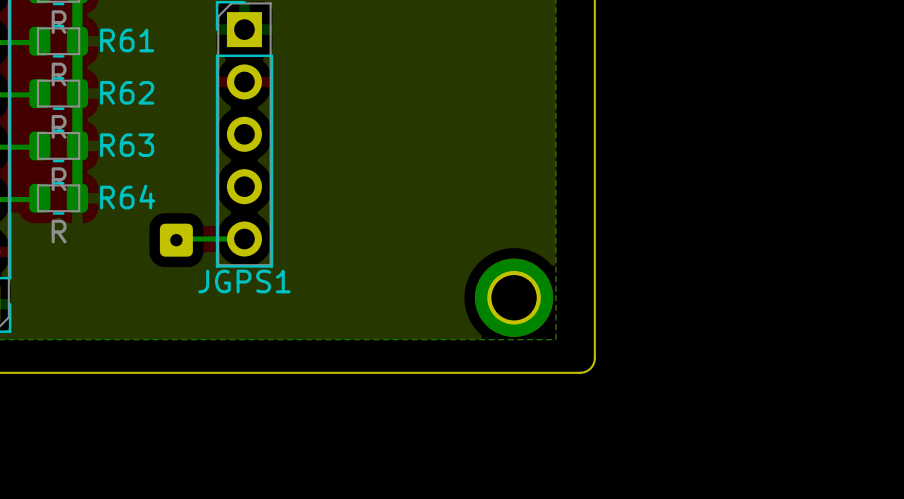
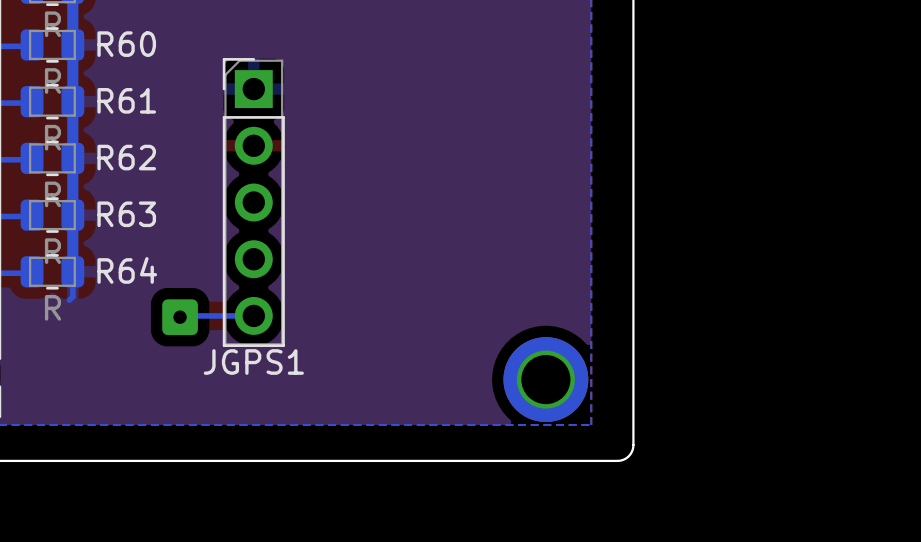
bottom track: none -> (72, 271) (72, 296) (69, 300)

